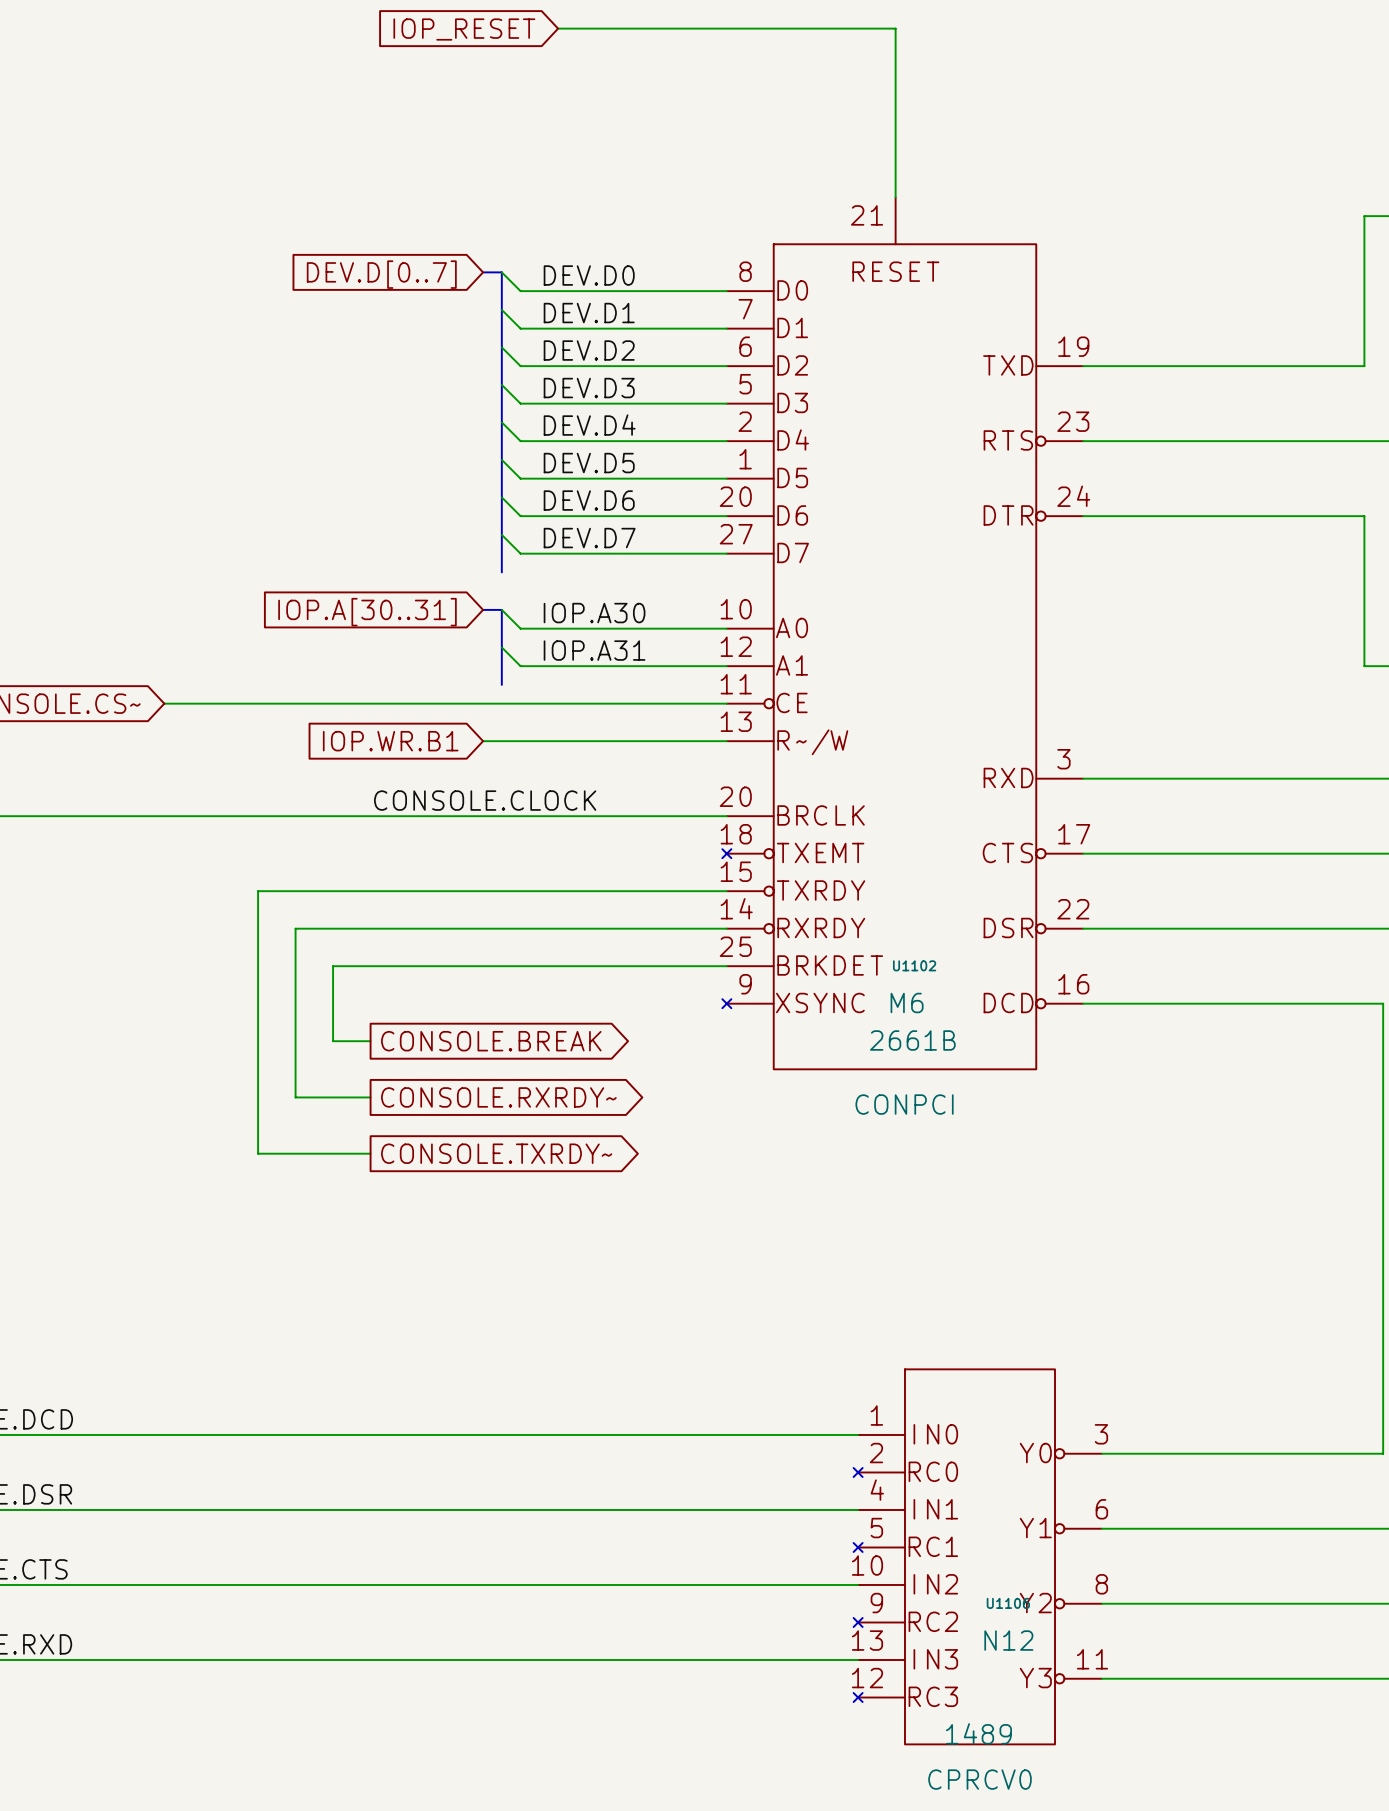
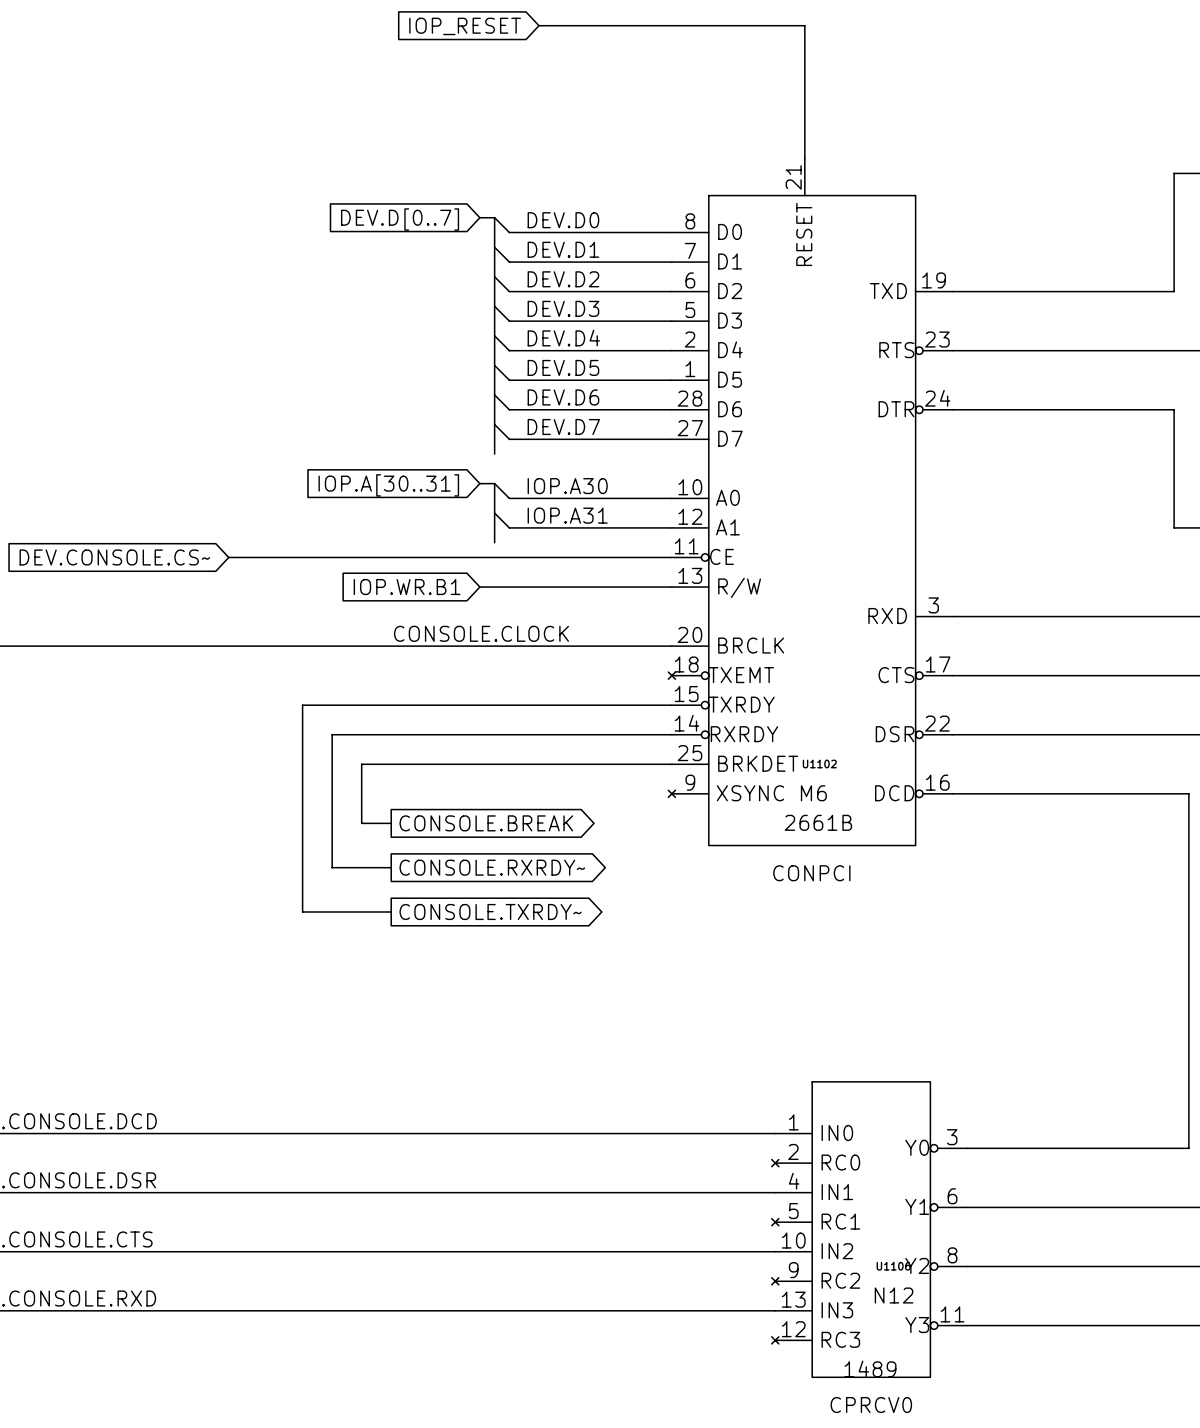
U1102 symbol: [726, 197, 1084, 1070] -> [671, 158, 953, 846]
U1106 symbol: [858, 1369, 1102, 1745] -> [775, 1081, 968, 1378]

